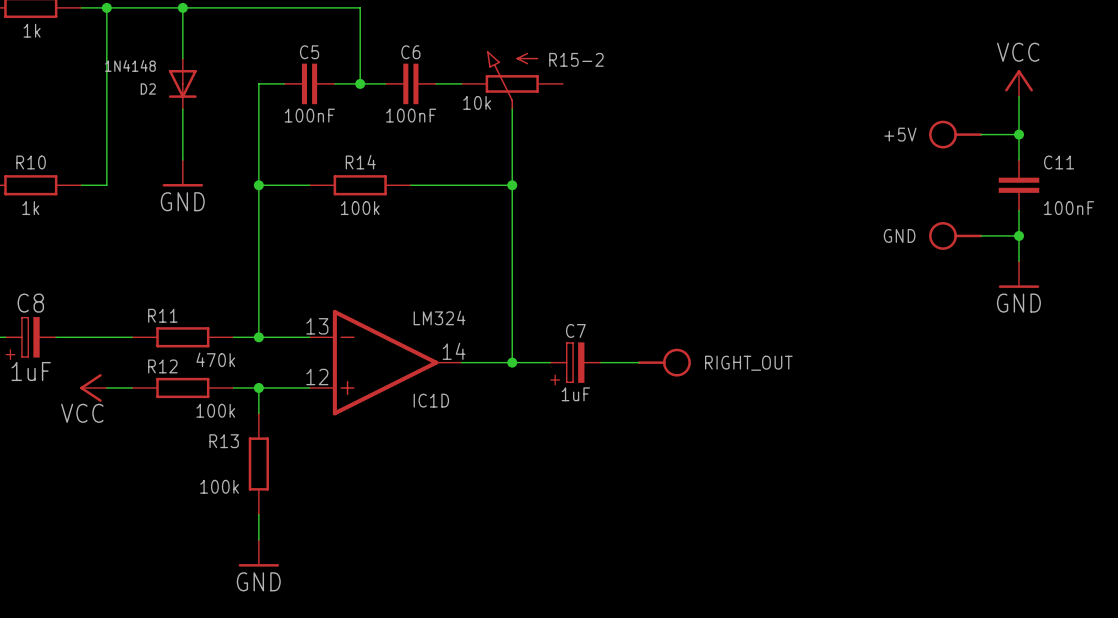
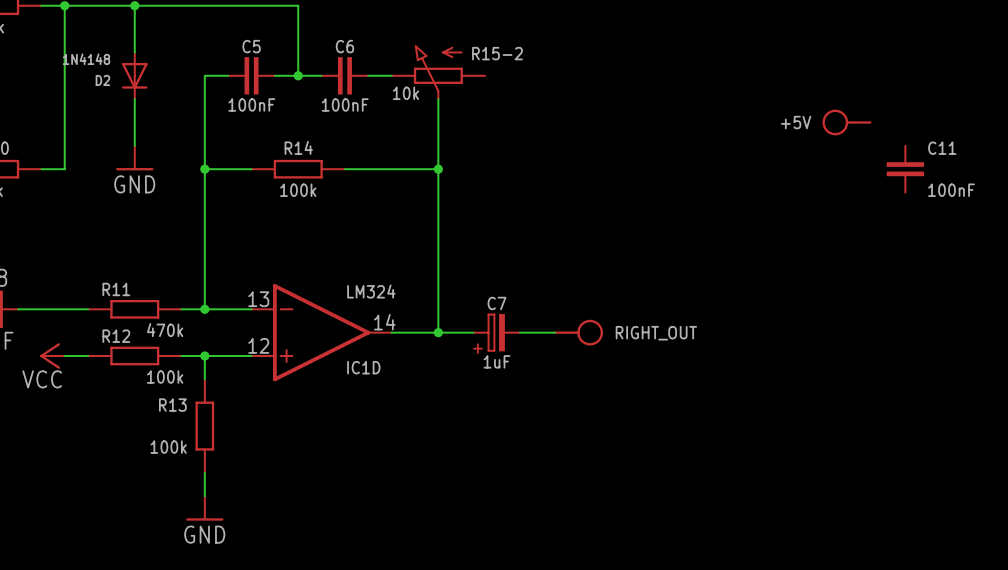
power symbol: VCC (1019, 83) -> none
wire: (1019, 96) (1019, 159) -> none
wire: (981, 134) (1019, 134) -> none
junction: (1019, 134) -> none
wire: (1019, 210) (1019, 261) -> none
GND: (955, 235) -> none
wire: (981, 235) (1019, 235) -> none
junction: (1019, 235) -> none
power symbol: GND (1019, 274) -> none

